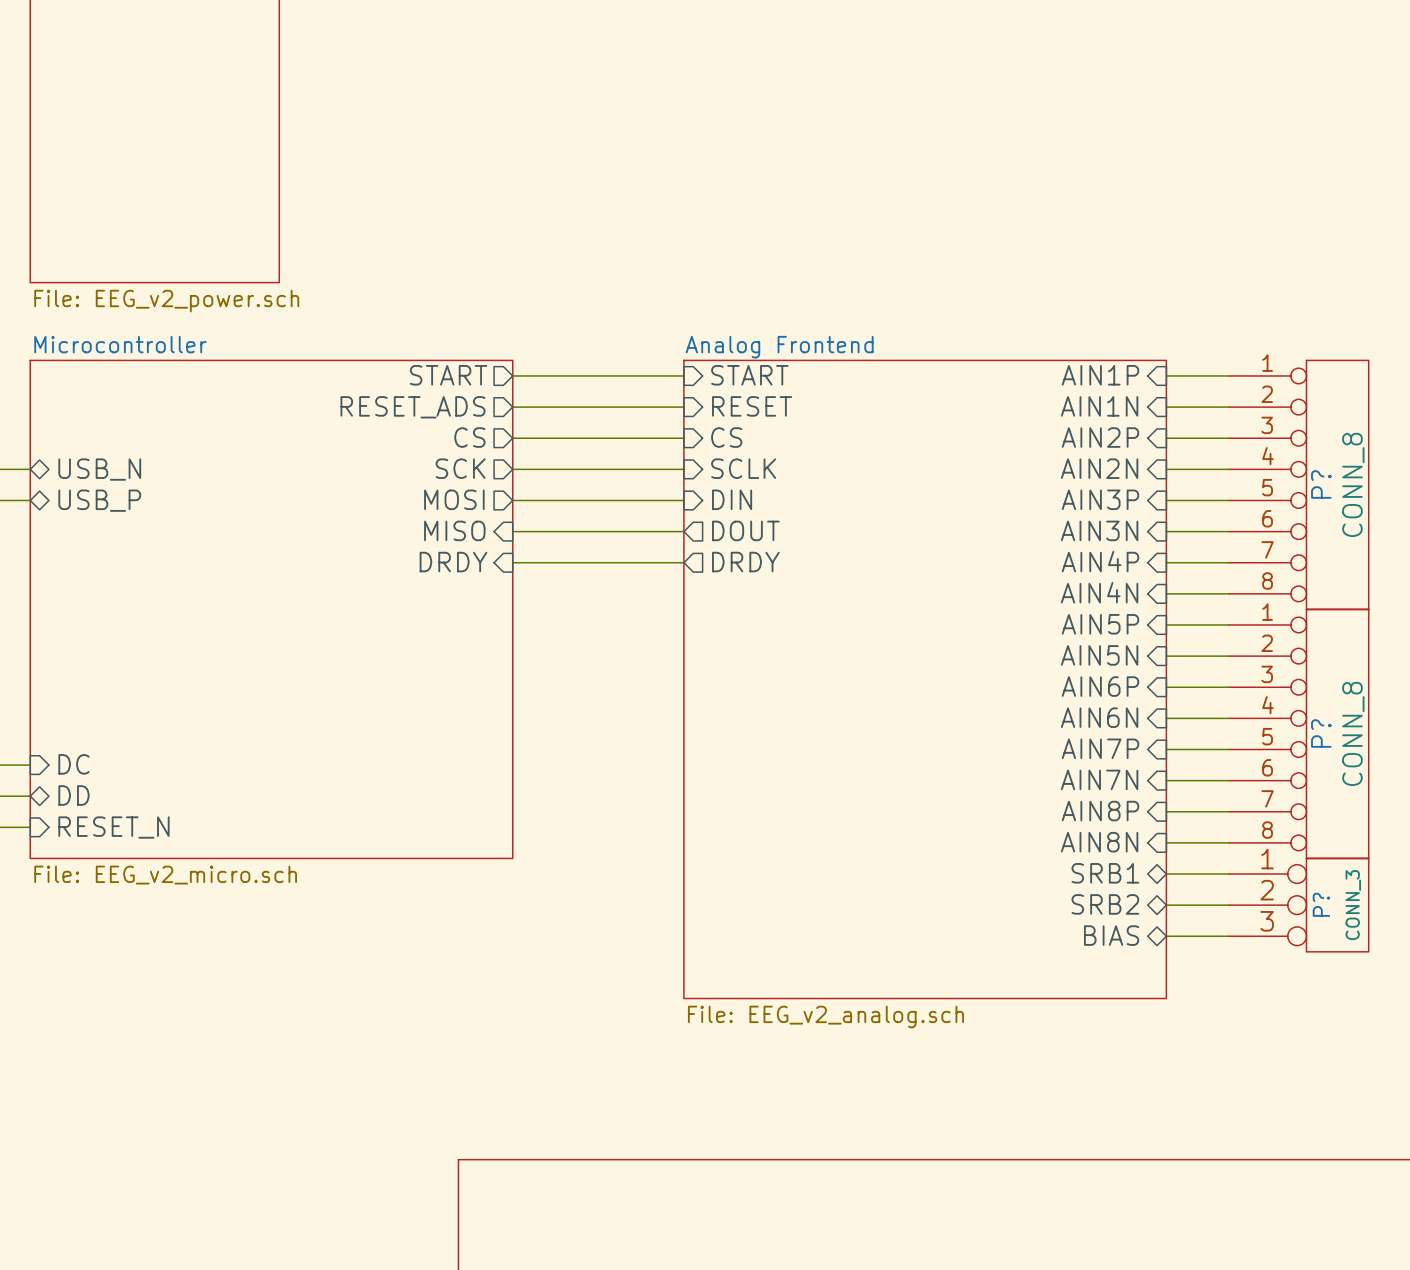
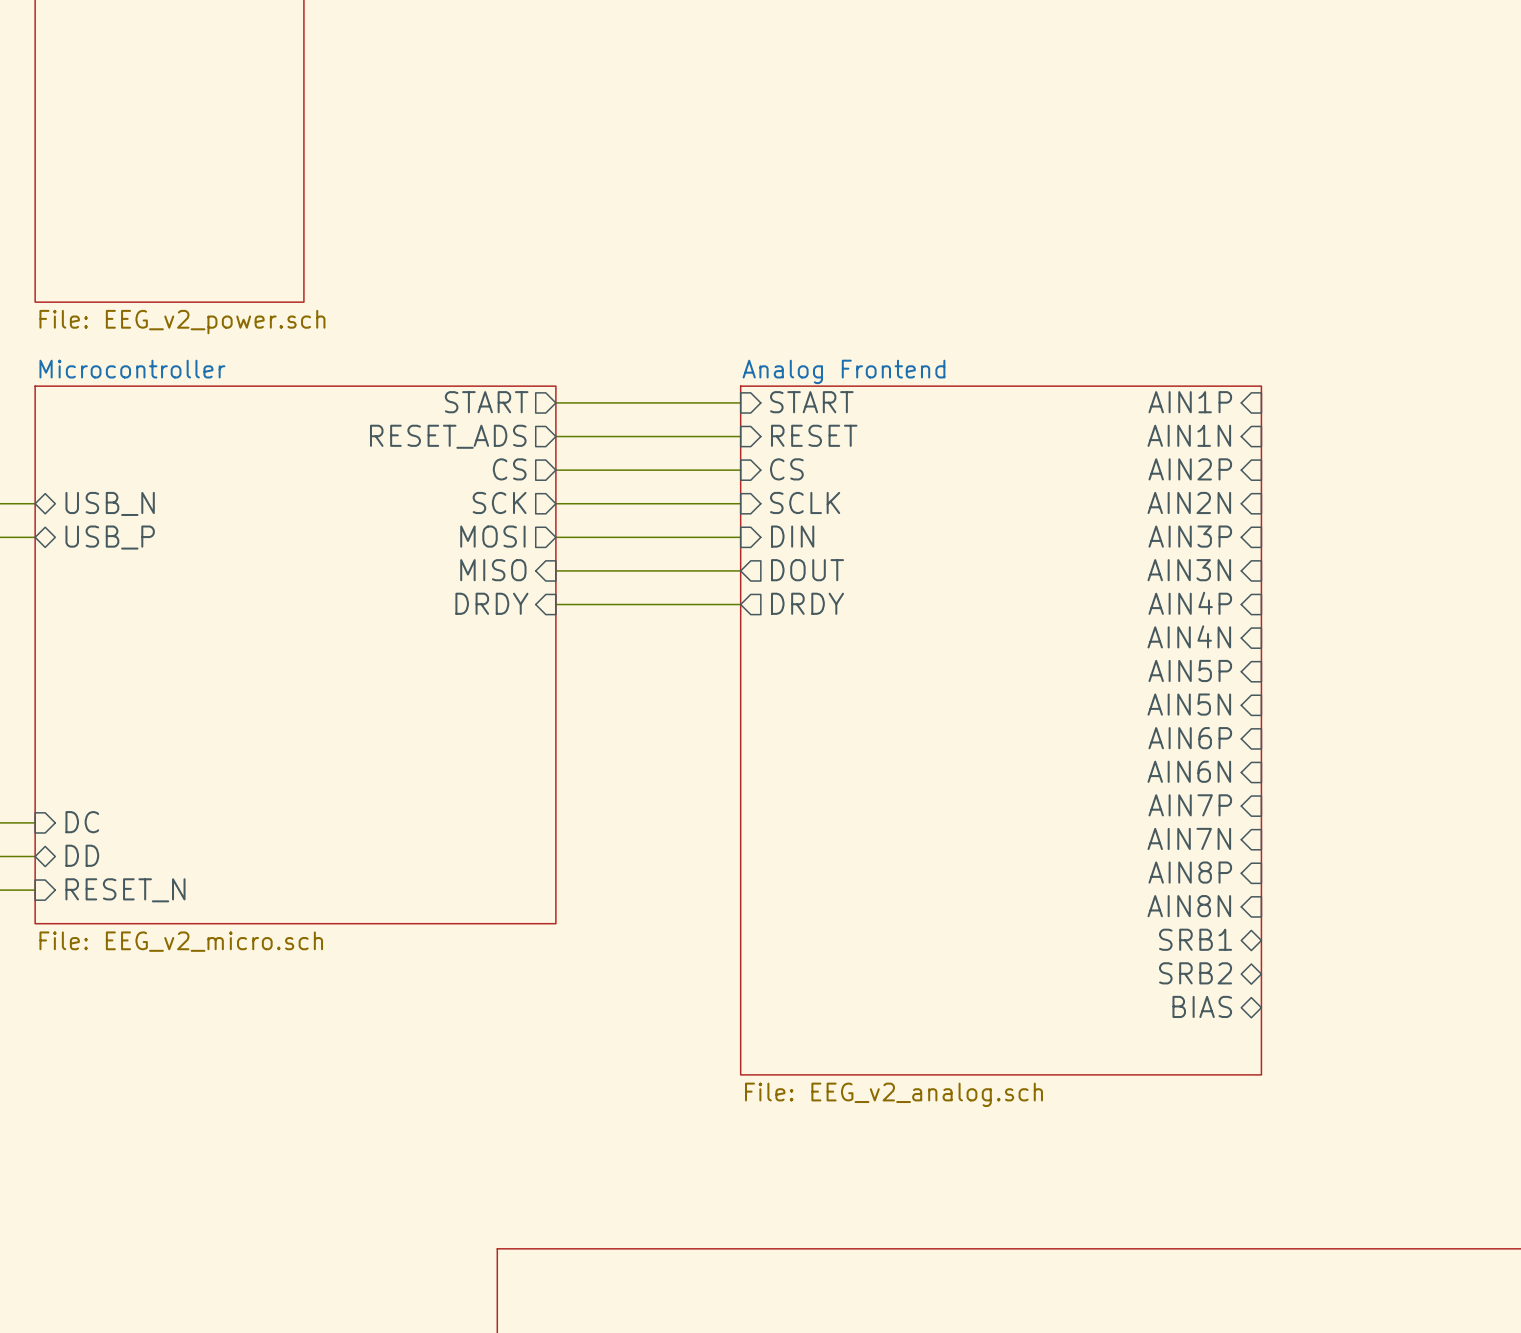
wire: (1166, 375) (1228, 375) -> none
wire: (1166, 407) (1228, 407) -> none
wire: (1166, 438) (1228, 438) -> none
wire: (1166, 469) (1228, 469) -> none
P?: CONN_8 (1298, 484) -> none
wire: (1166, 500) (1228, 500) -> none
wire: (1166, 531) (1228, 531) -> none
wire: (1166, 562) (1228, 562) -> none
wire: (1166, 593) (1228, 593) -> none
wire: (1166, 624) (1228, 624) -> none
wire: (1166, 656) (1228, 656) -> none
wire: (1166, 687) (1228, 687) -> none
wire: (1166, 718) (1228, 718) -> none
P?: CONN_8 (1298, 733) -> none
wire: (1166, 749) (1228, 749) -> none
wire: (1166, 780) (1228, 780) -> none
wire: (1166, 811) (1228, 811) -> none
wire: (1166, 842) (1228, 842) -> none
wire: (1166, 874) (1228, 874) -> none
wire: (1166, 905) (1228, 905) -> none
P?: CONN_3 (1298, 905) -> none
wire: (1166, 936) (1228, 936) -> none

